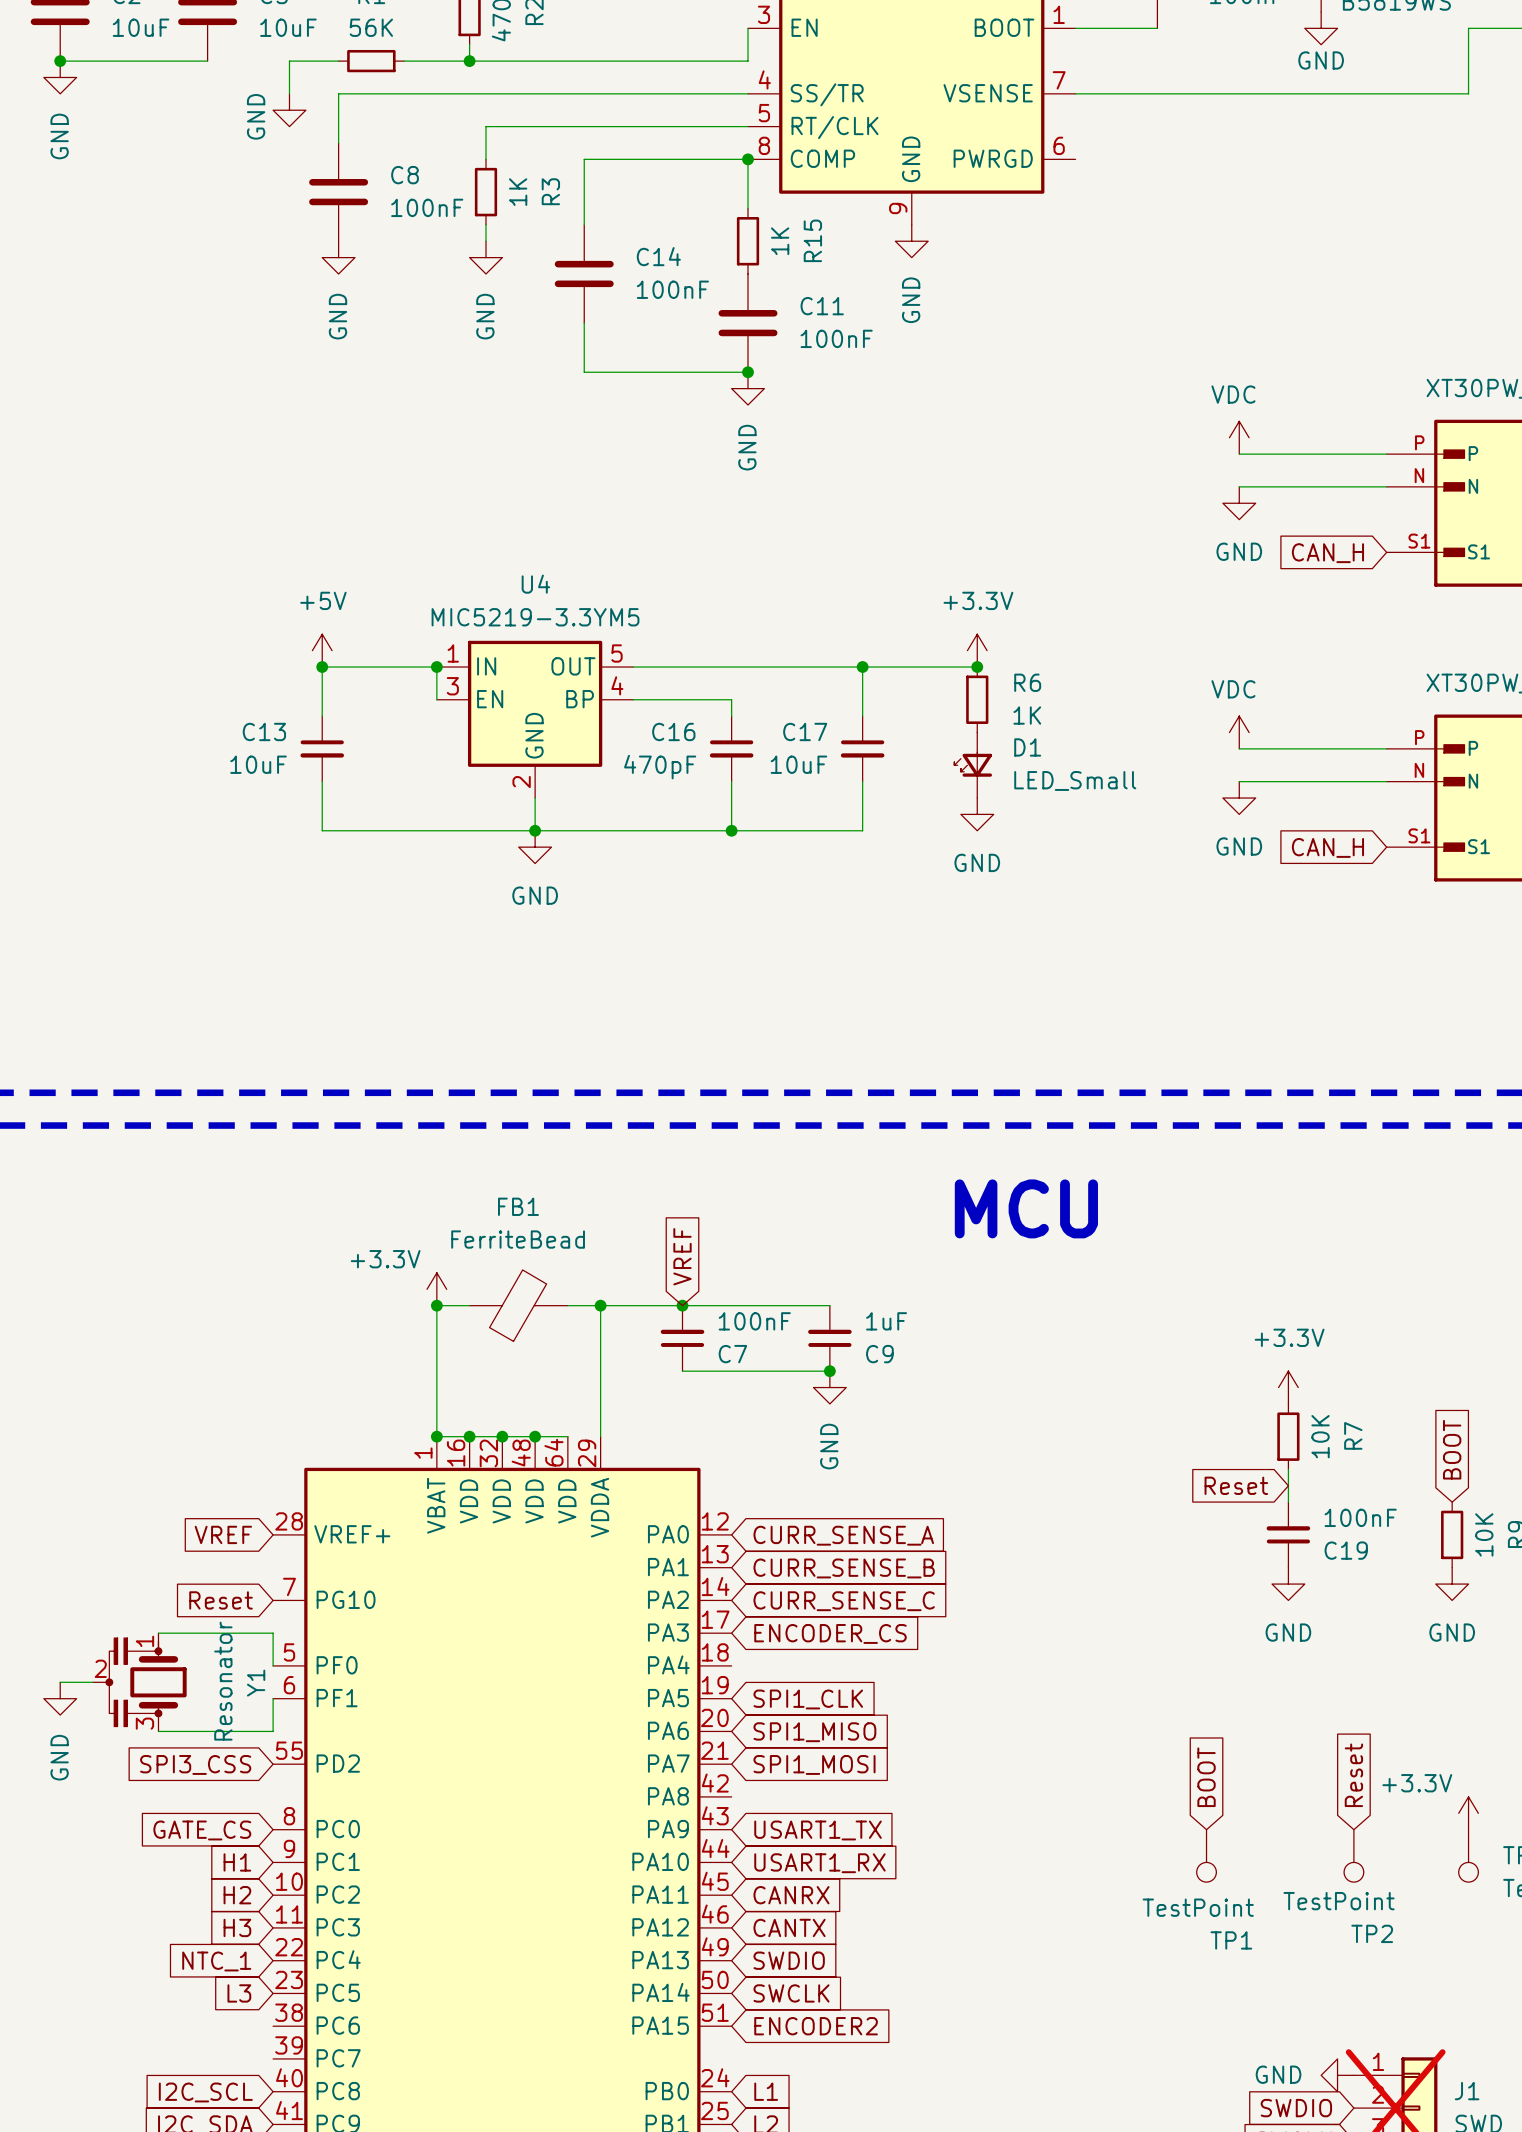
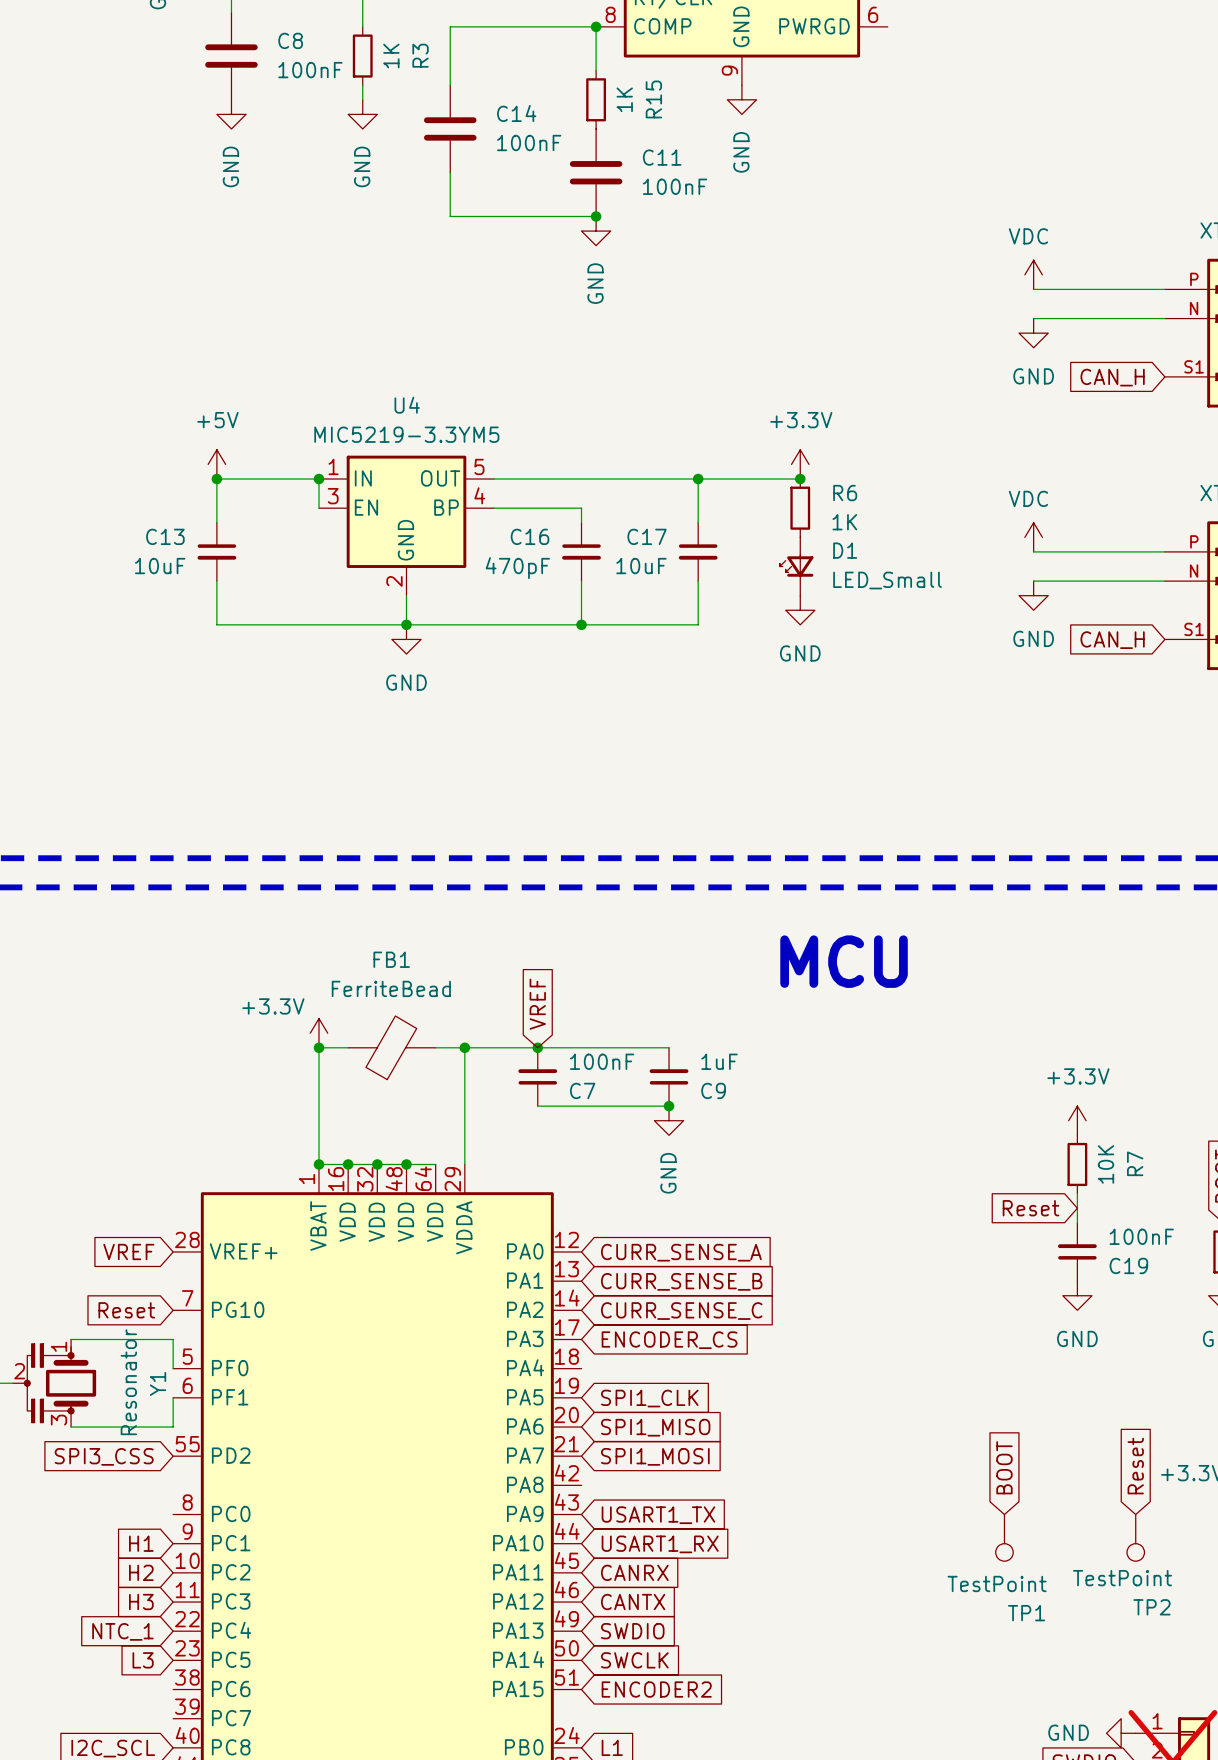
global label: GATE_CS (202, 1830) -> none

